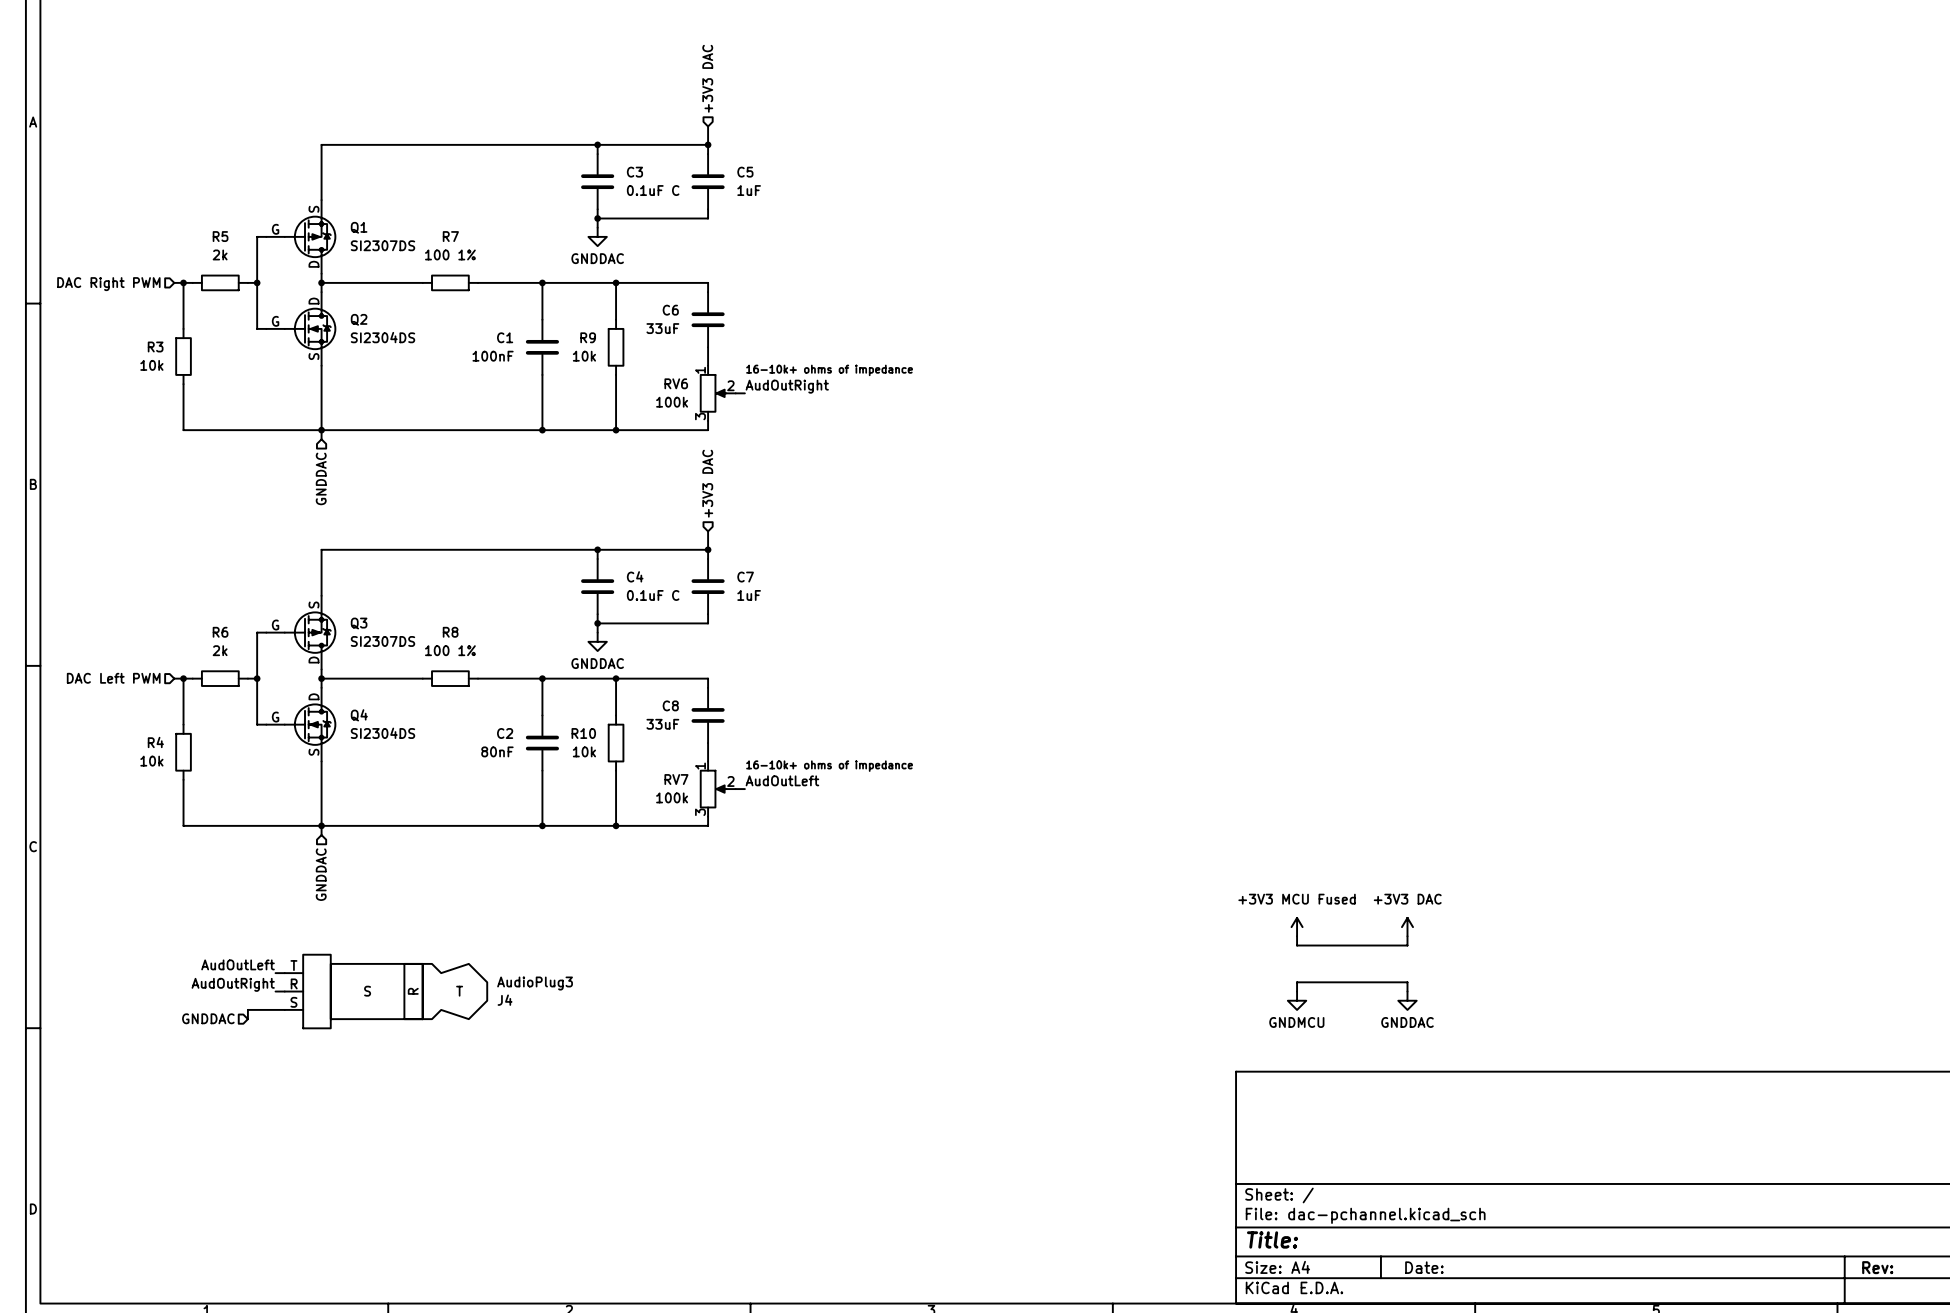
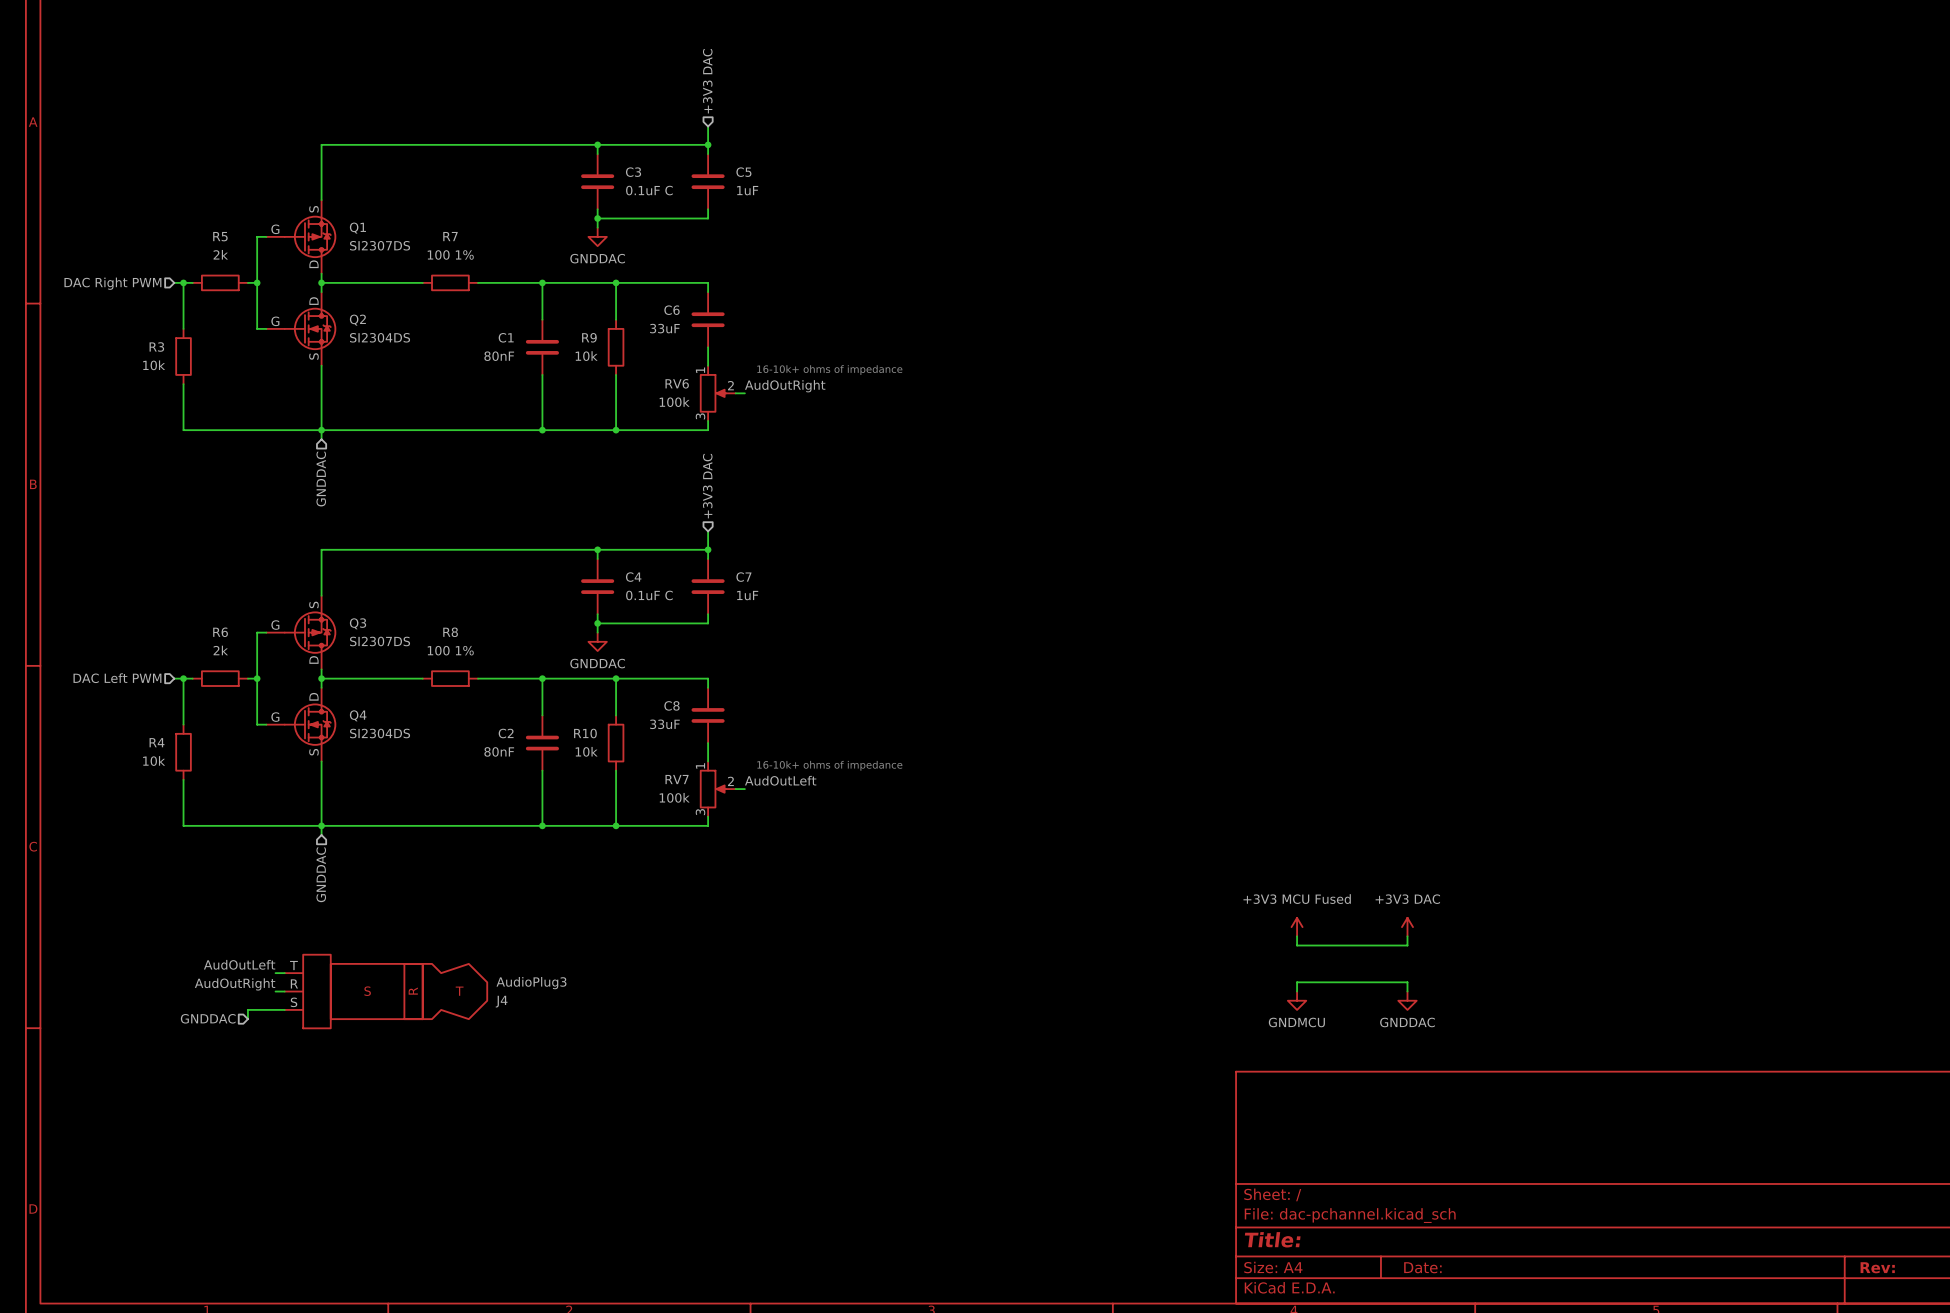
C1 value: 100nF (493, 356) -> 80nF (499, 356)

